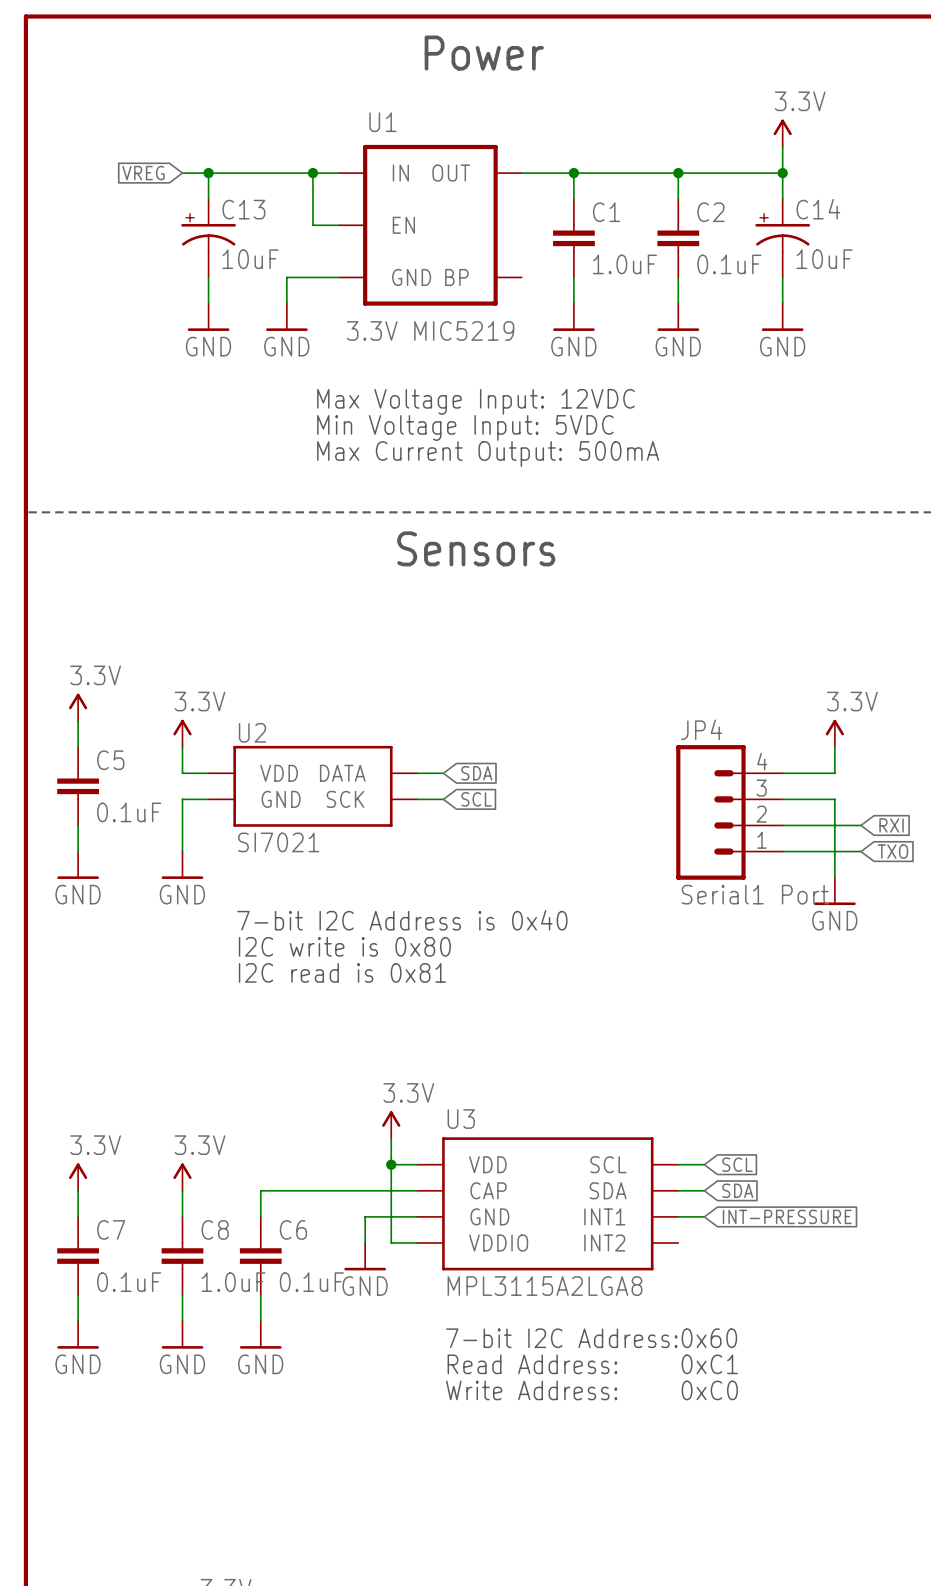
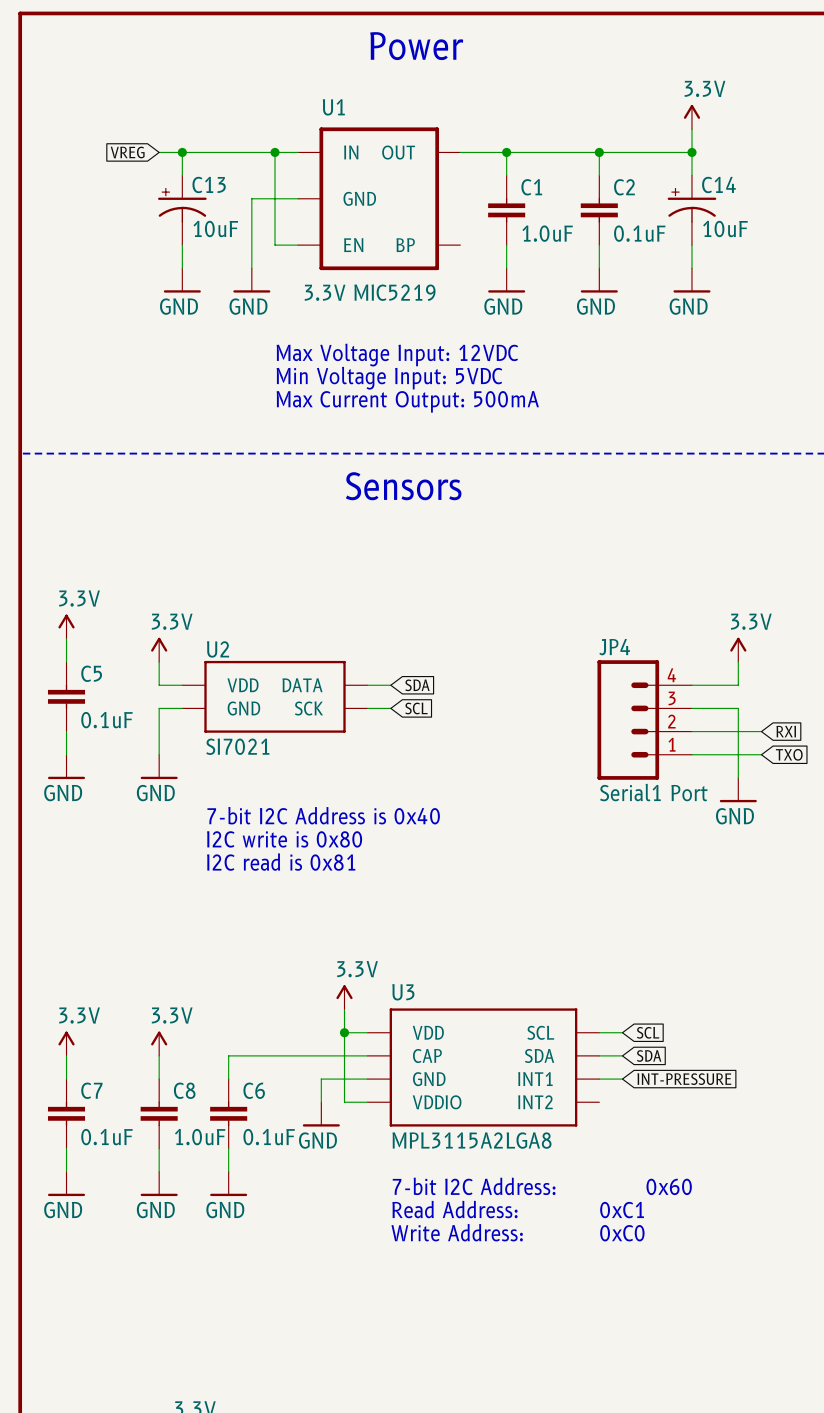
U1 pin name: EN (403, 225) -> GND (359, 198)
wire: (286, 277) (312, 277) -> (251, 245) (251, 198) (275, 198) (275, 245)
U1 pin name: GND (411, 277) -> EN (353, 245)
text position: 0x60 (709, 1338) -> 0x60 (669, 1186)

